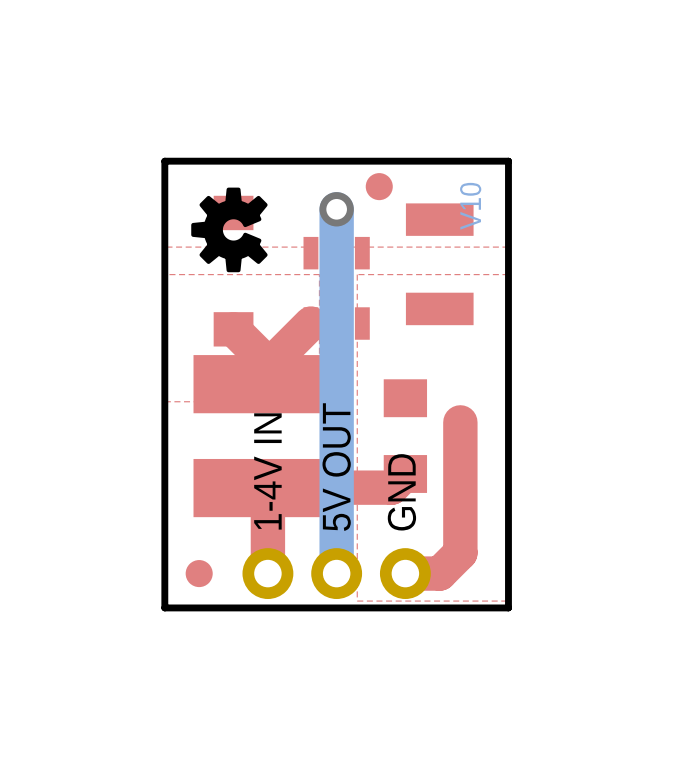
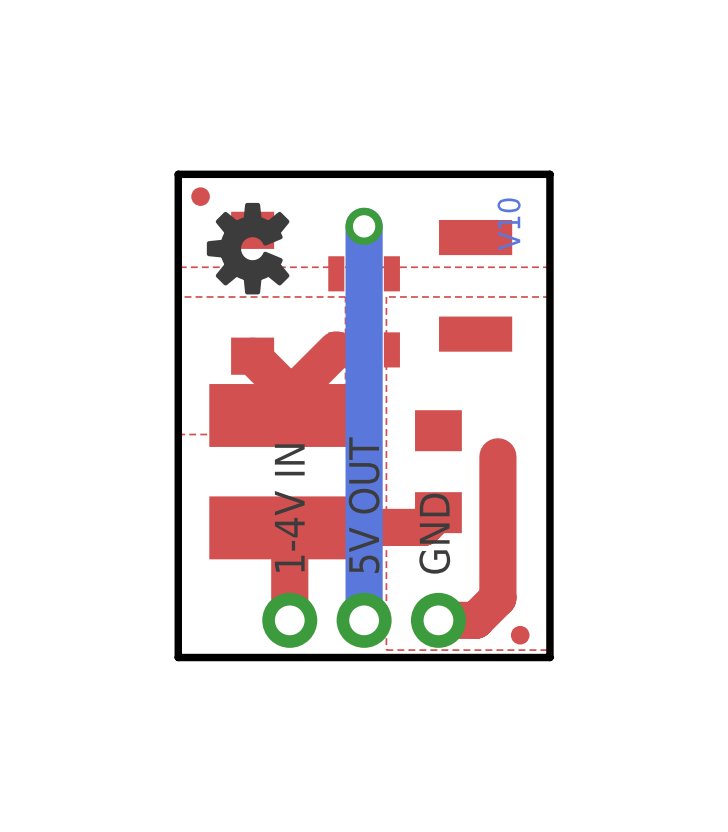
part: none -> (200, 196)
part: (379, 186) -> none
part: (199, 573) -> none
part: none -> (520, 635)

